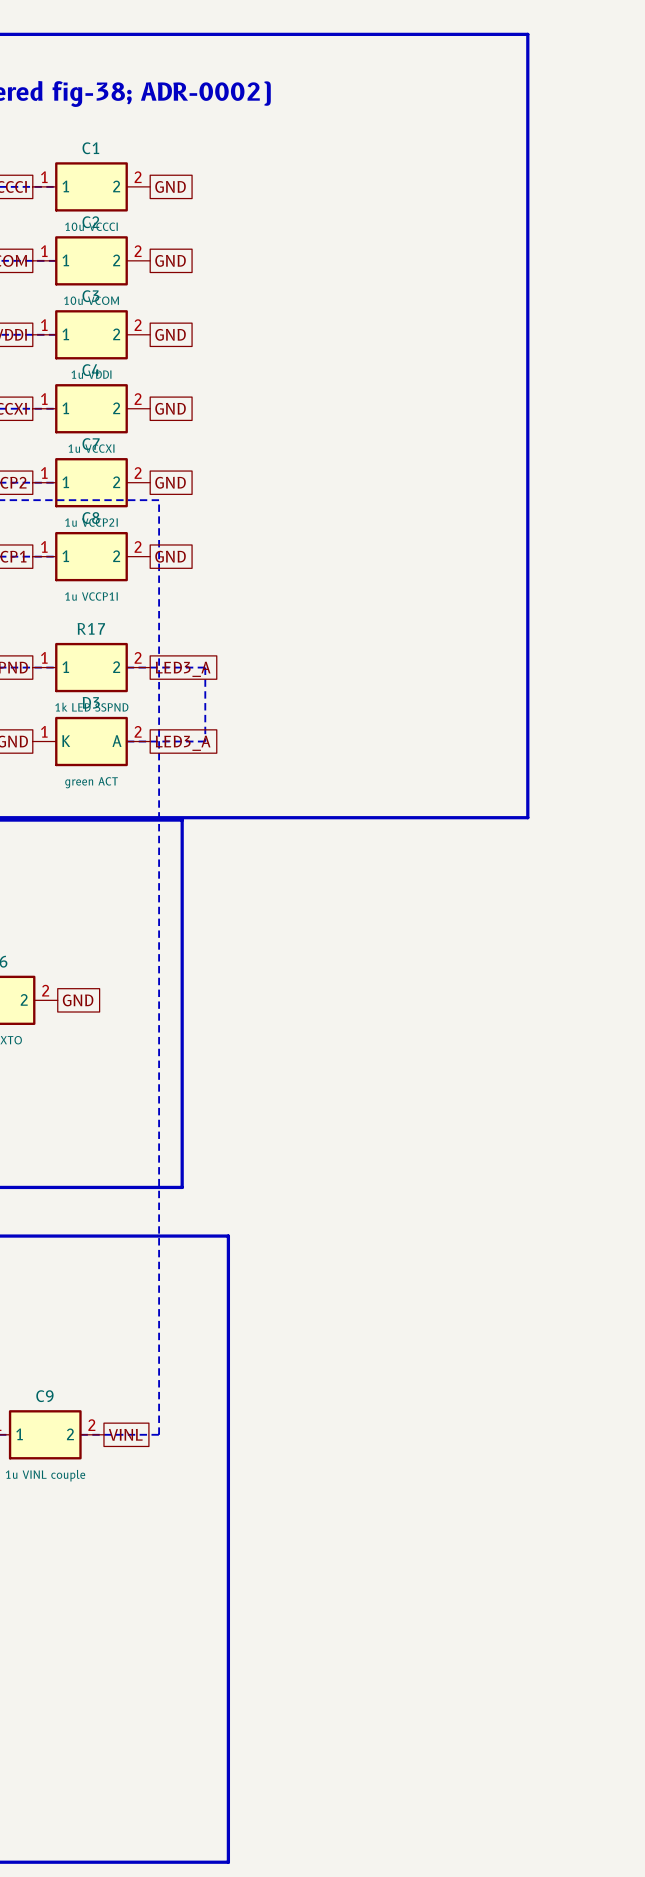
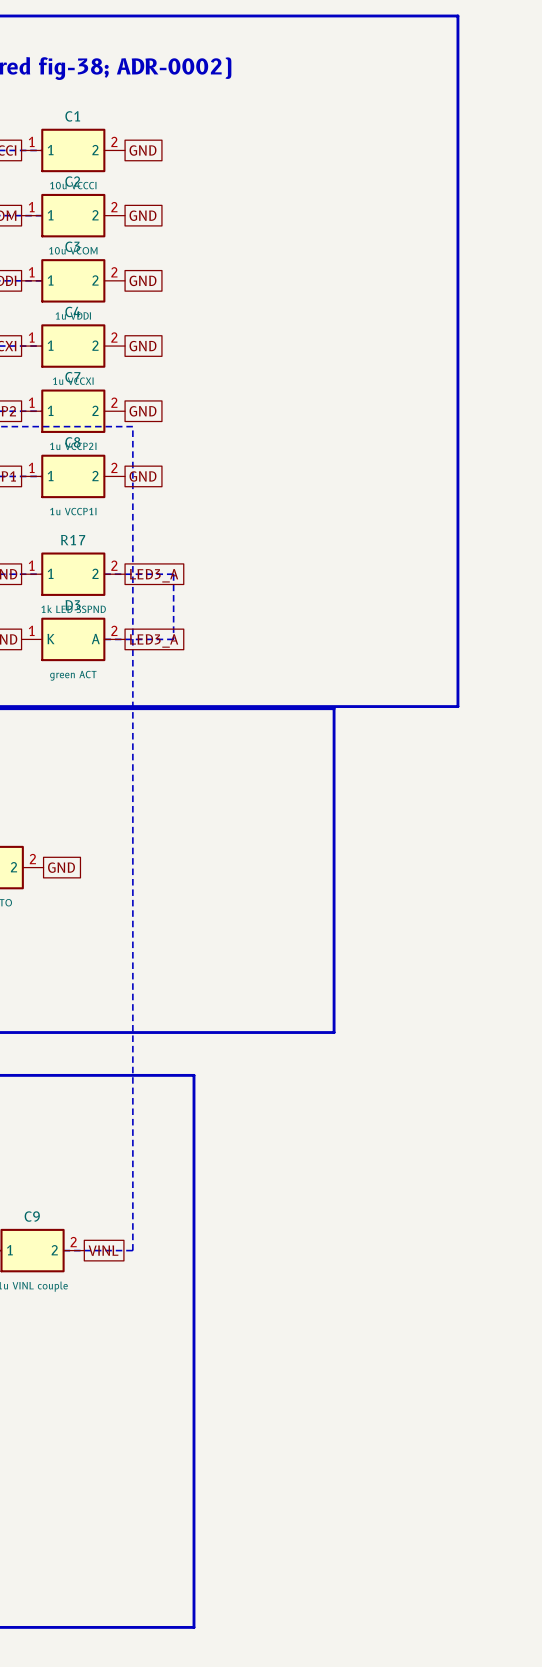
line: (182, 820) (182, 1187) -> (153, 708) (334, 708) (334, 1032) (153, 1032)

